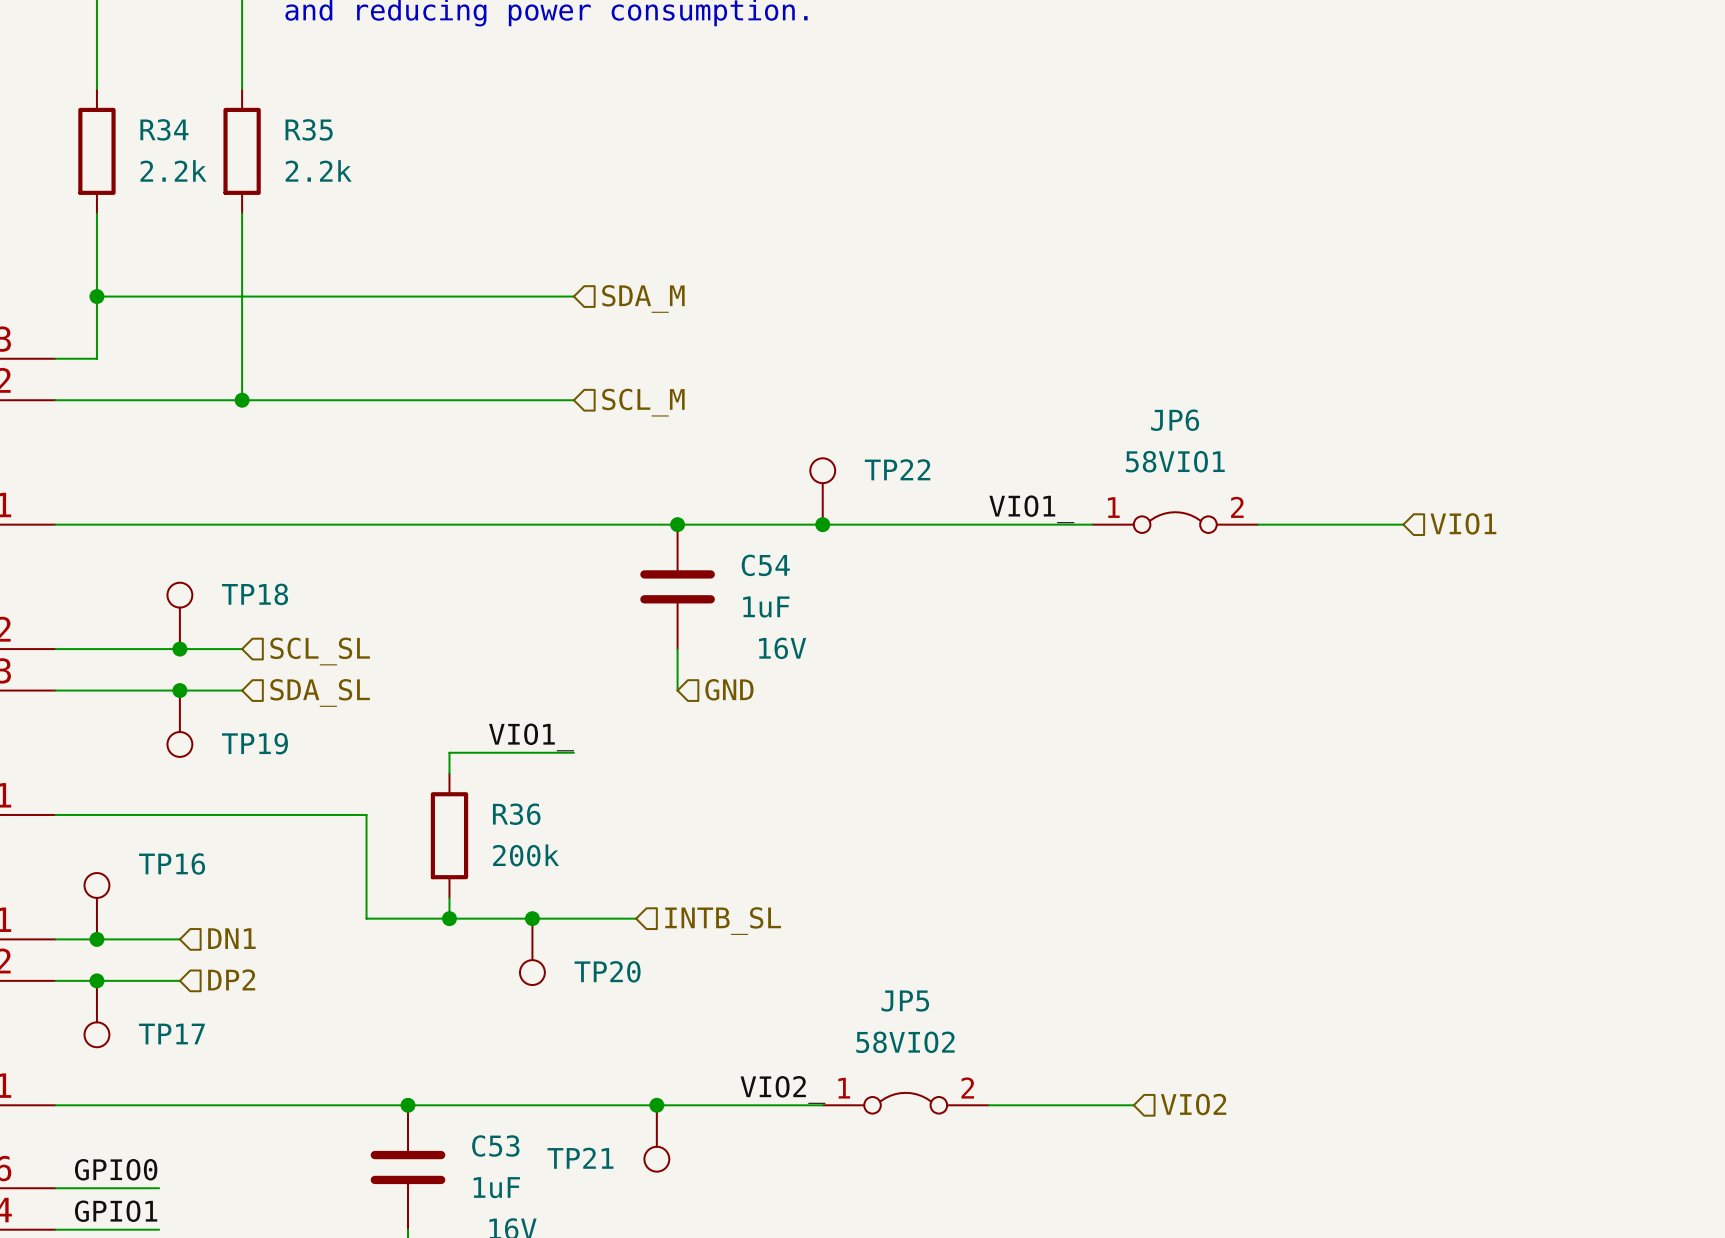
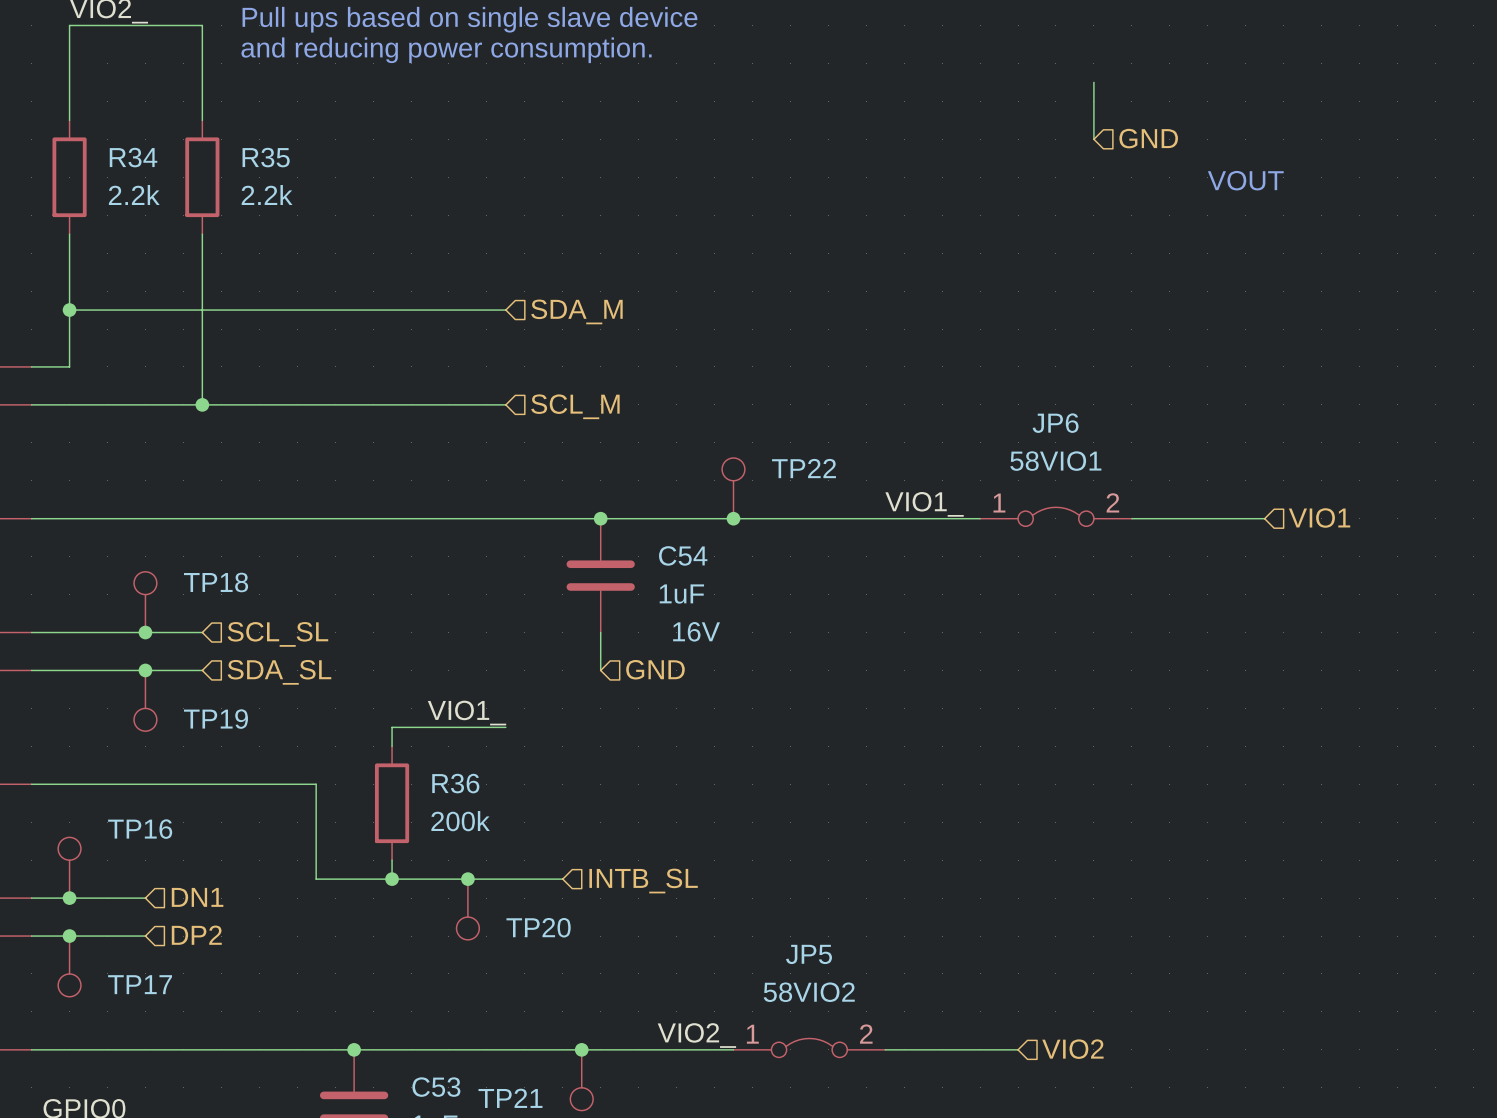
wire: none -> (1093, 82) (1093, 139)
hierarchical label: none -> GND (1148, 138)
text: none -> VOUT (1245, 180)

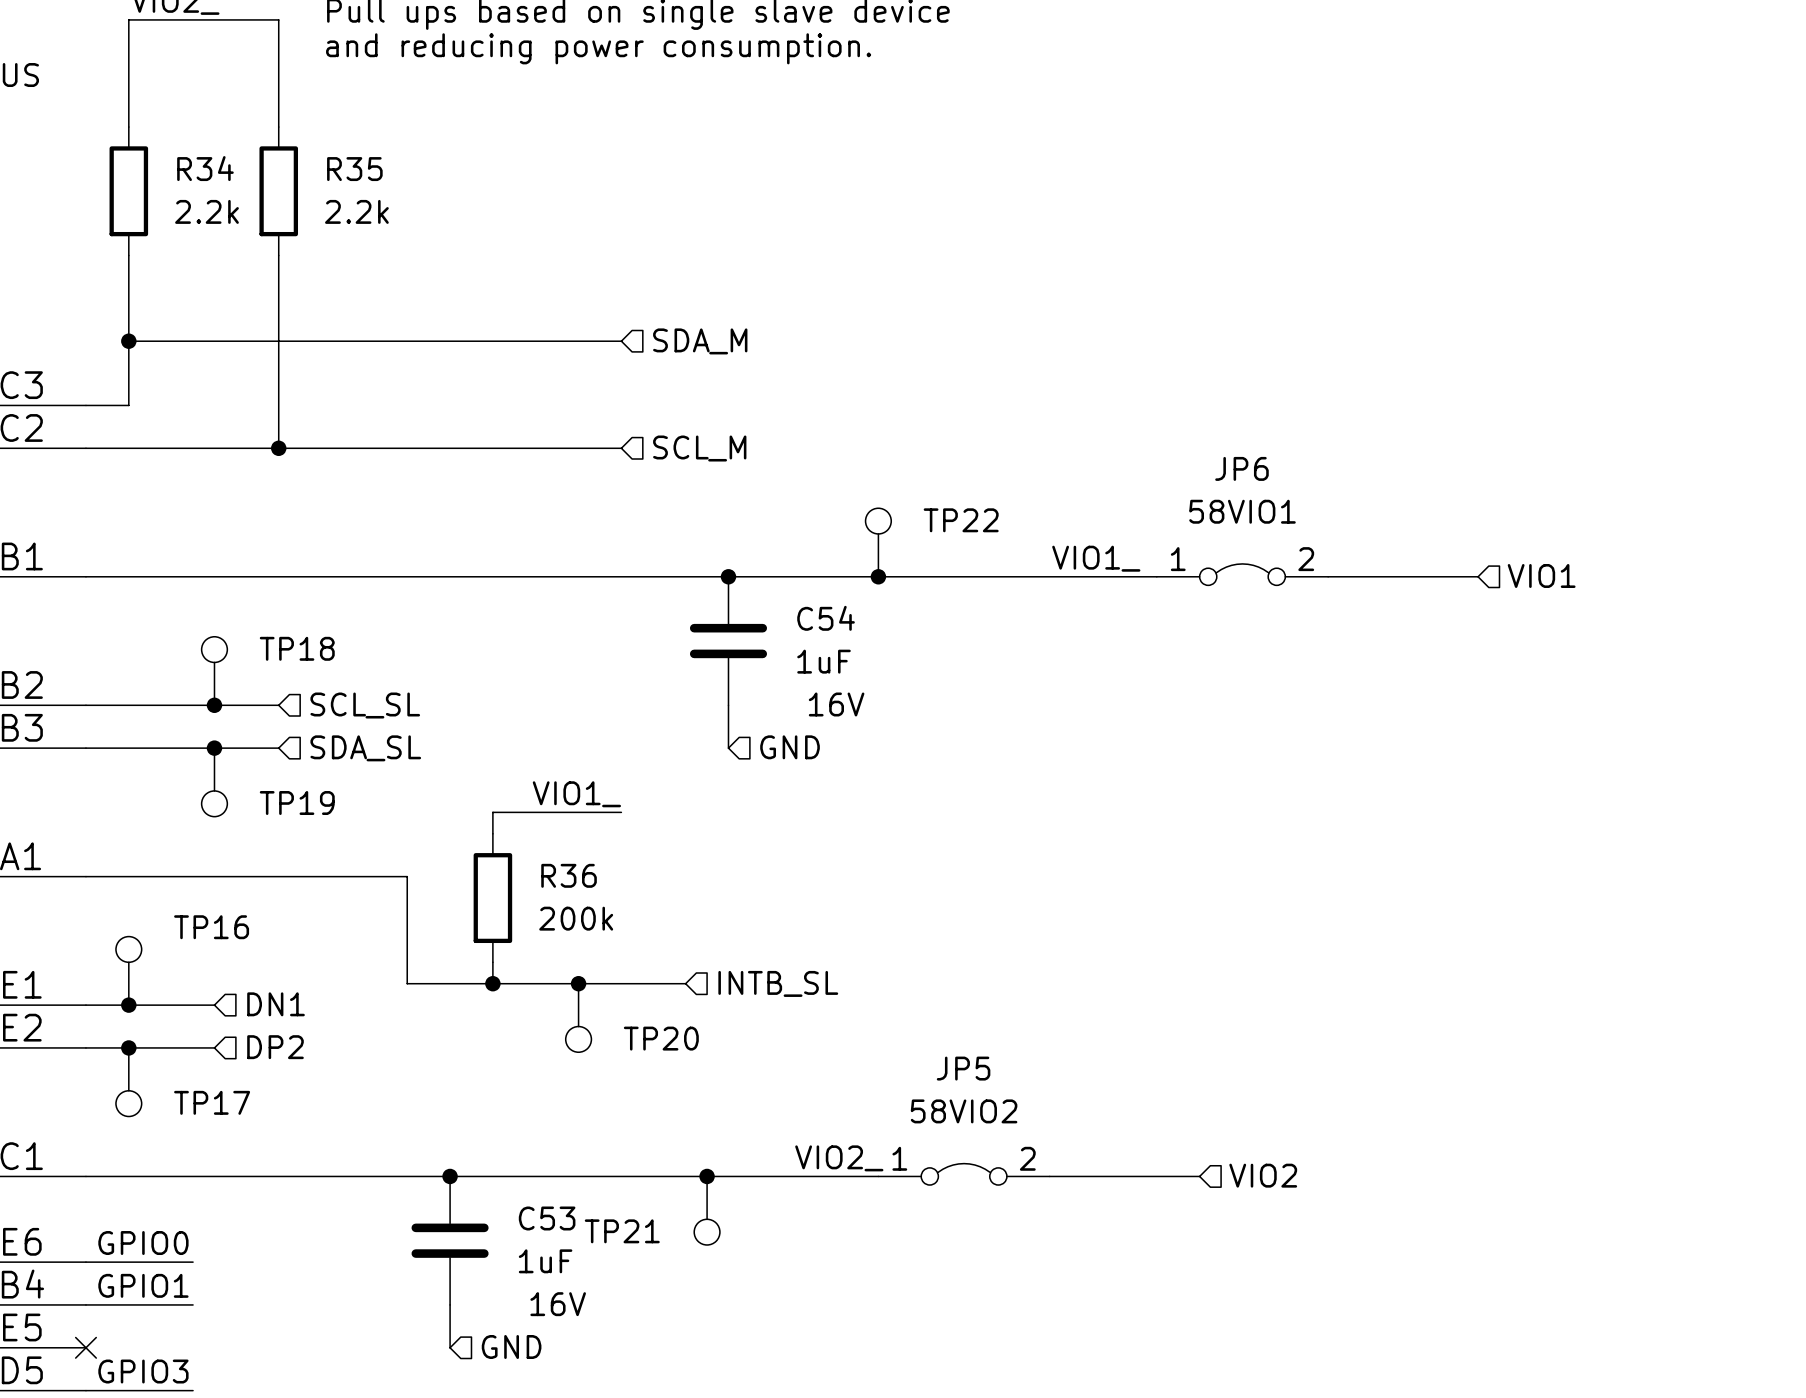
wire: (1093, 82) (1093, 139) -> none
hierarchical label: GND (1148, 138) -> none
text: VOUT (1245, 180) -> none

